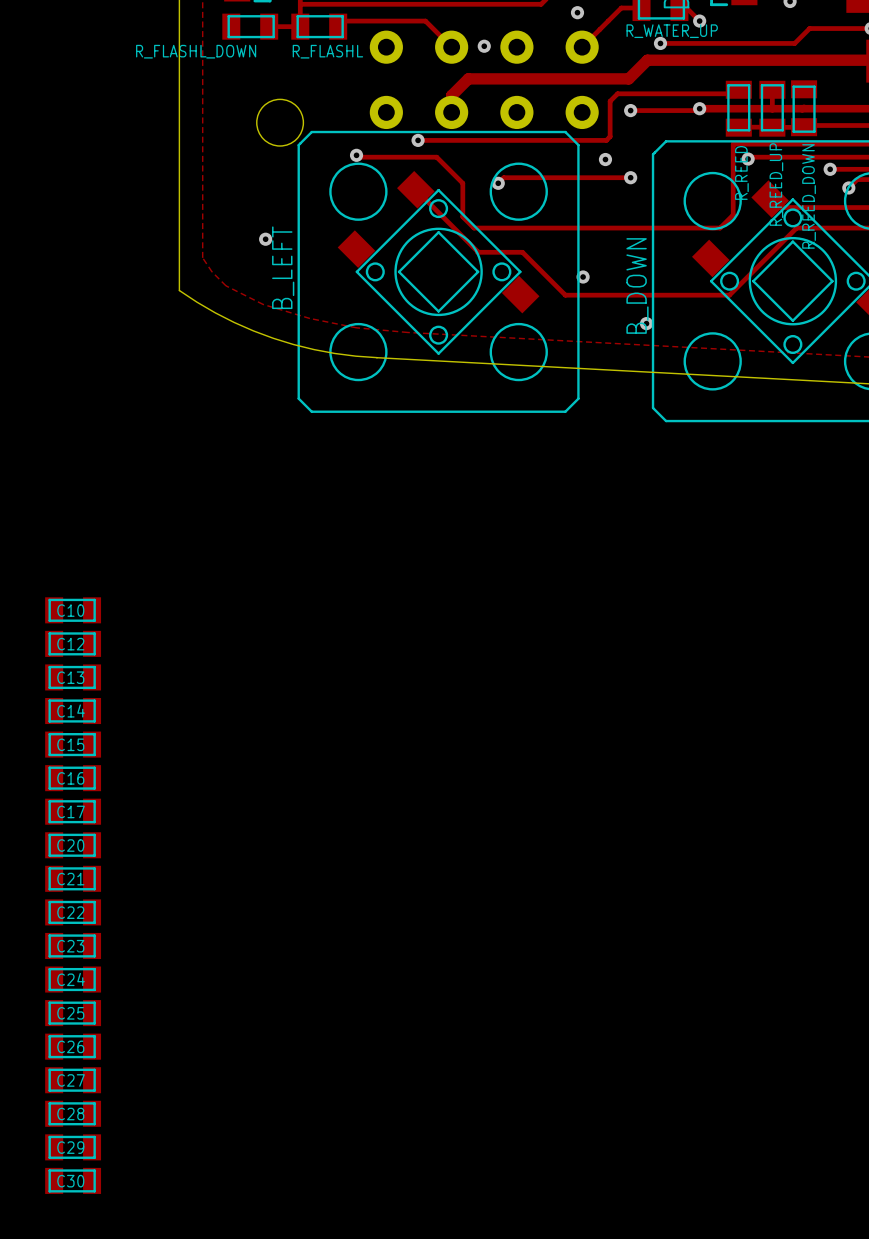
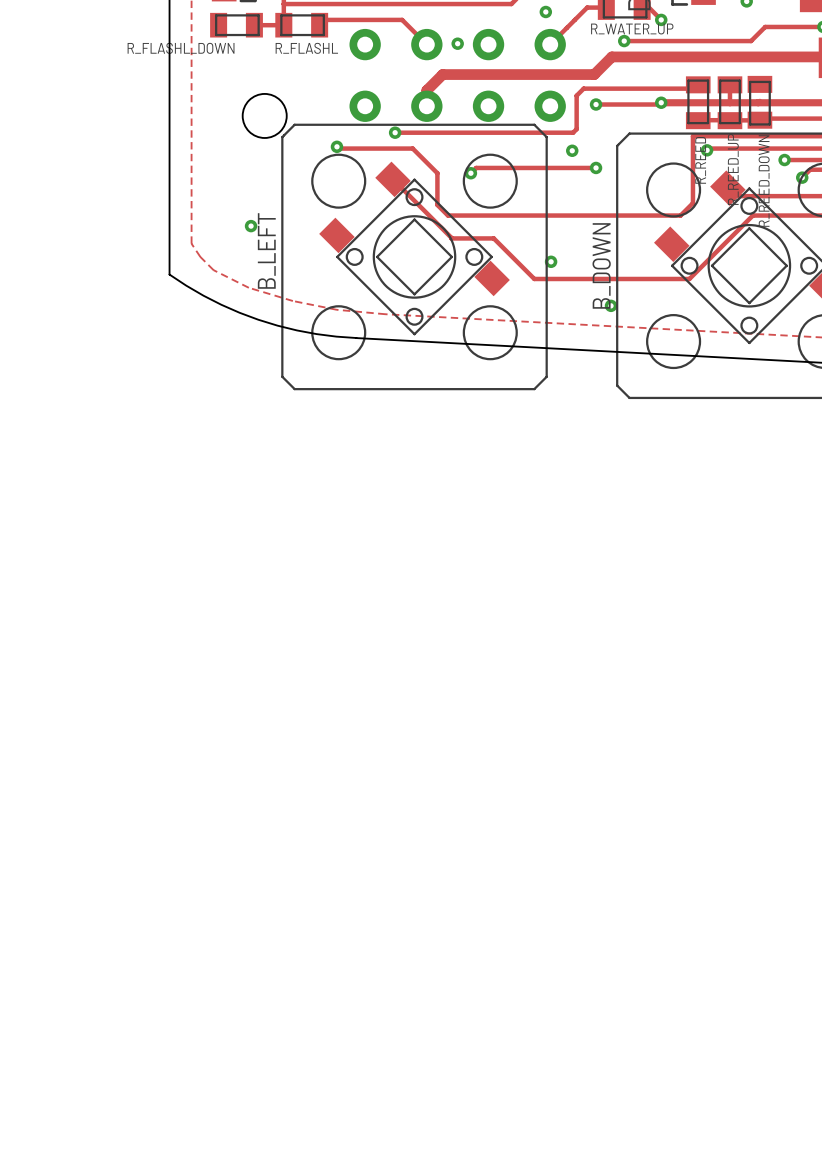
C10: (73, 610) -> none
C12: (73, 643) -> none
C13: (73, 677) -> none
C14: (73, 711) -> none
C15: (73, 744) -> none
C16: (73, 778) -> none
C17: (73, 811) -> none
C20: (73, 845) -> none
C21: (73, 878) -> none
C22: (73, 912) -> none
C23: (73, 945) -> none
C24: (73, 979) -> none
C25: (73, 1013) -> none
C26: (73, 1046) -> none
C27: (73, 1080) -> none
C28: (73, 1113) -> none
C29: (73, 1147) -> none
C30: (73, 1180) -> none

